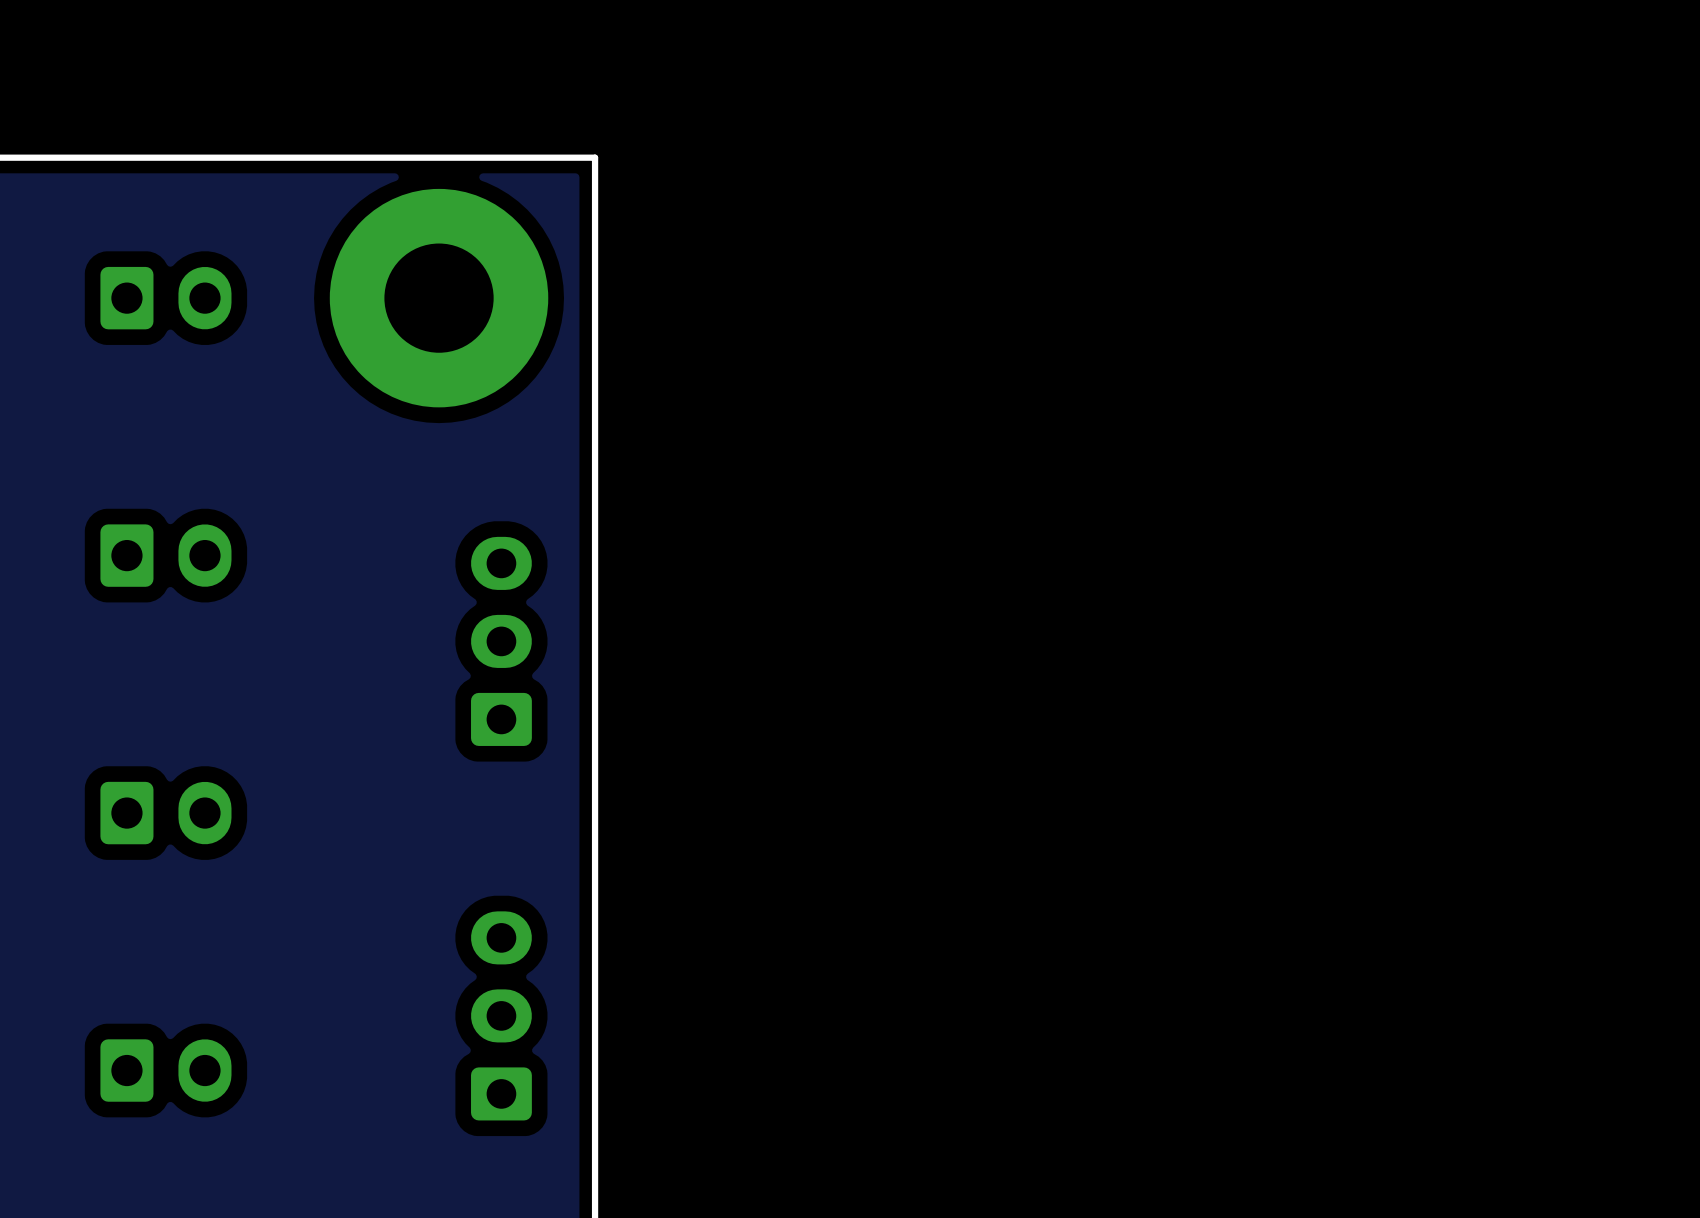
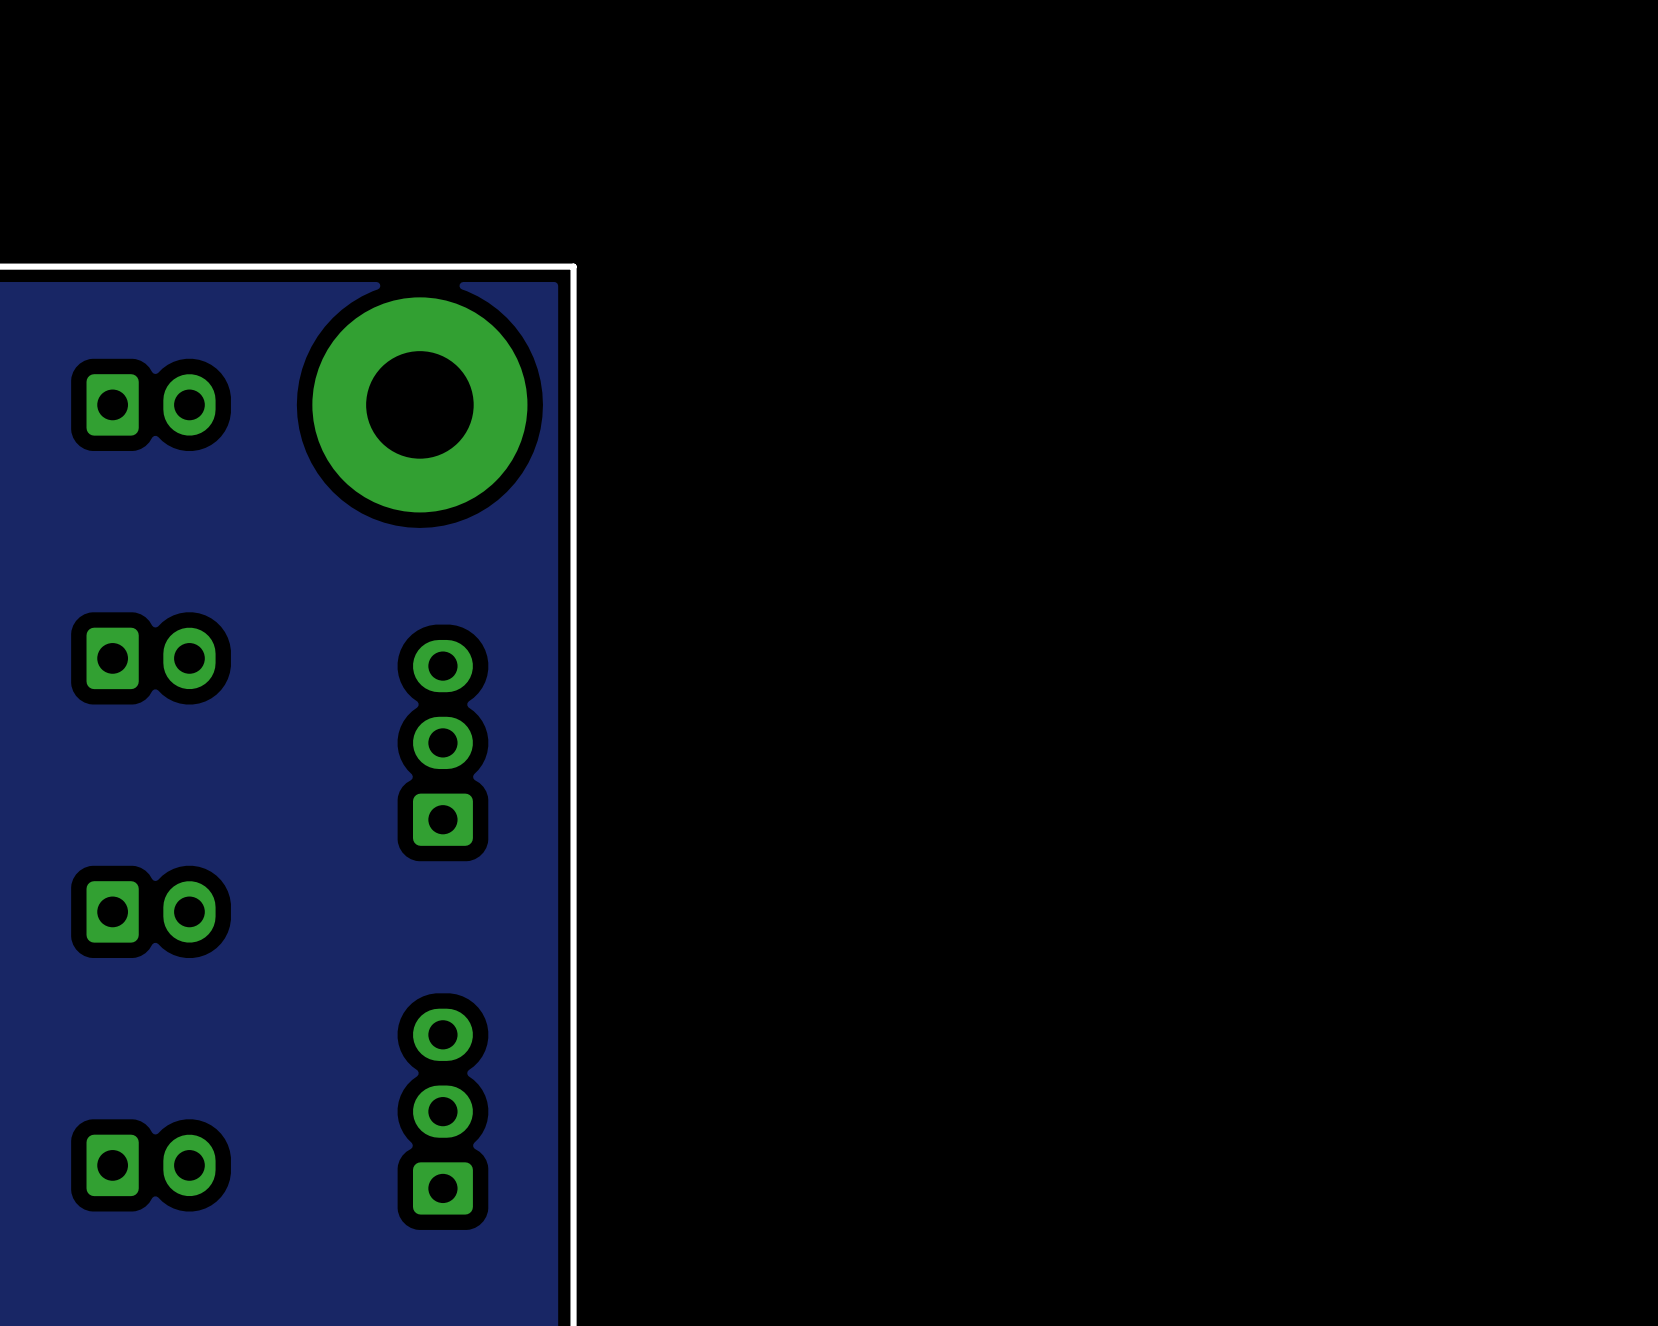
part position: (501, 641) -> (442, 742)
part position: (501, 1015) -> (442, 1111)

